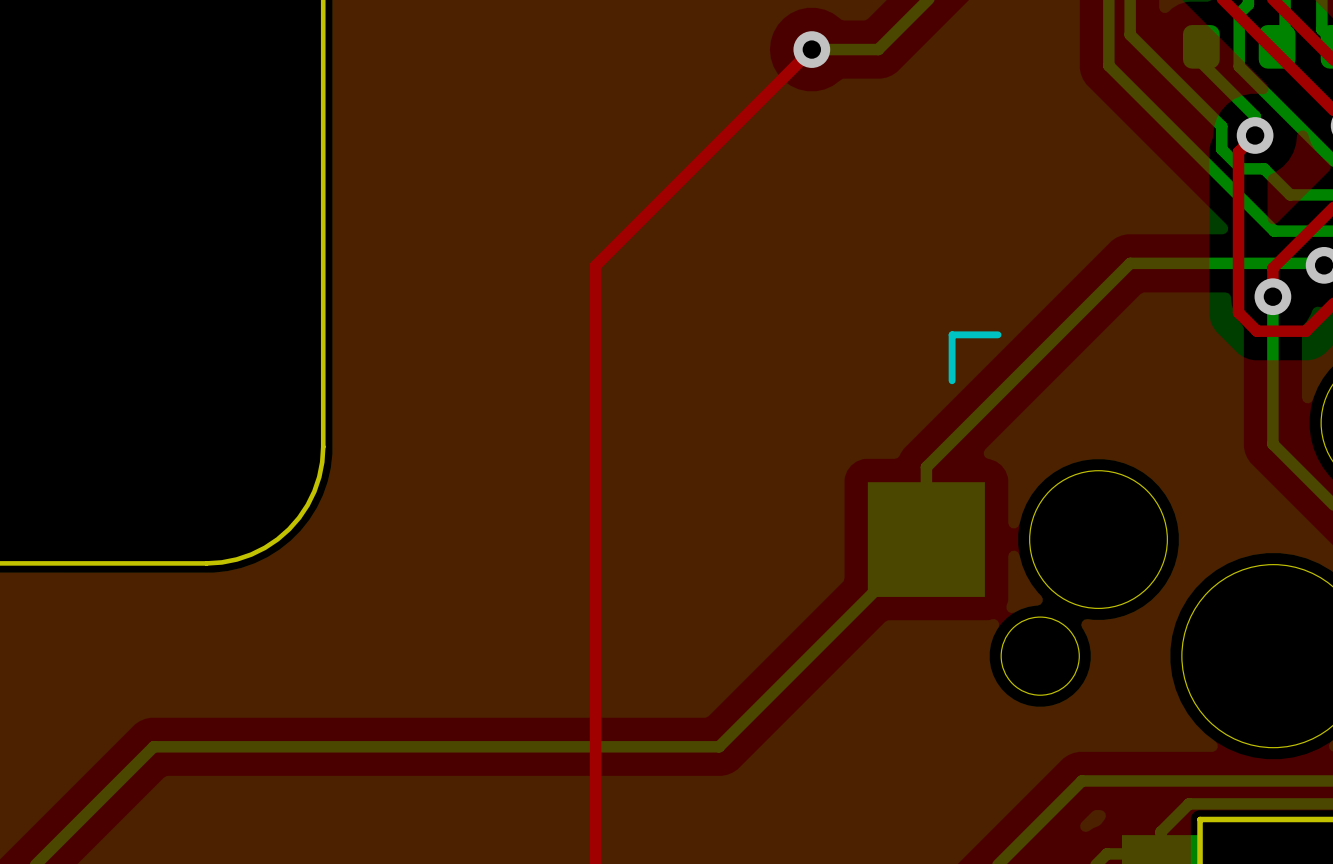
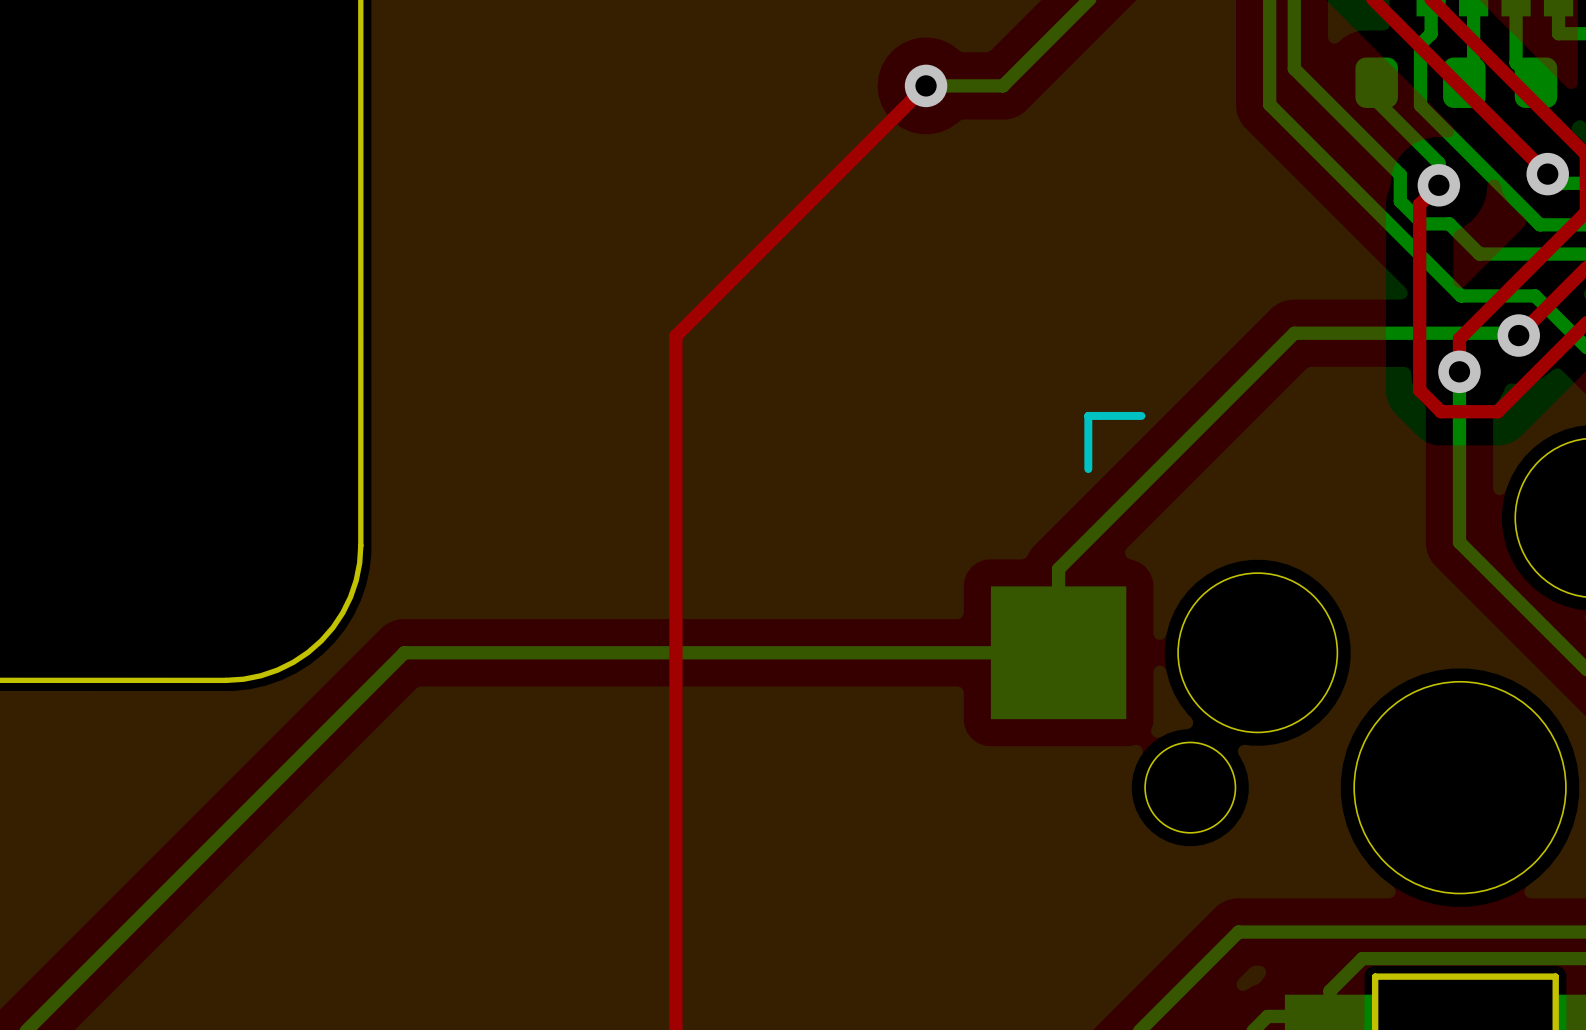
bottom track: (926, 539) (719, 746) (153, 746) -> (1058, 652) (404, 652) (164, 892)

